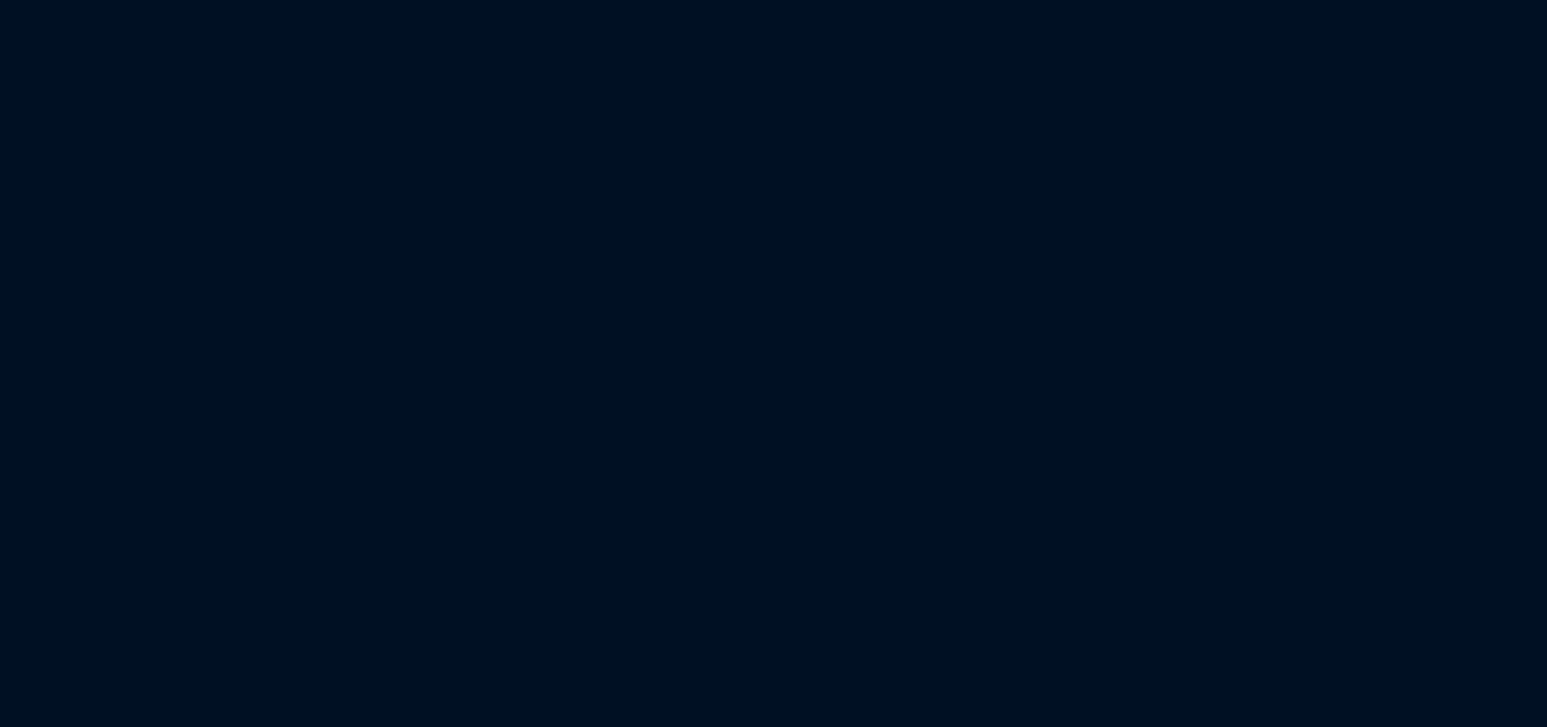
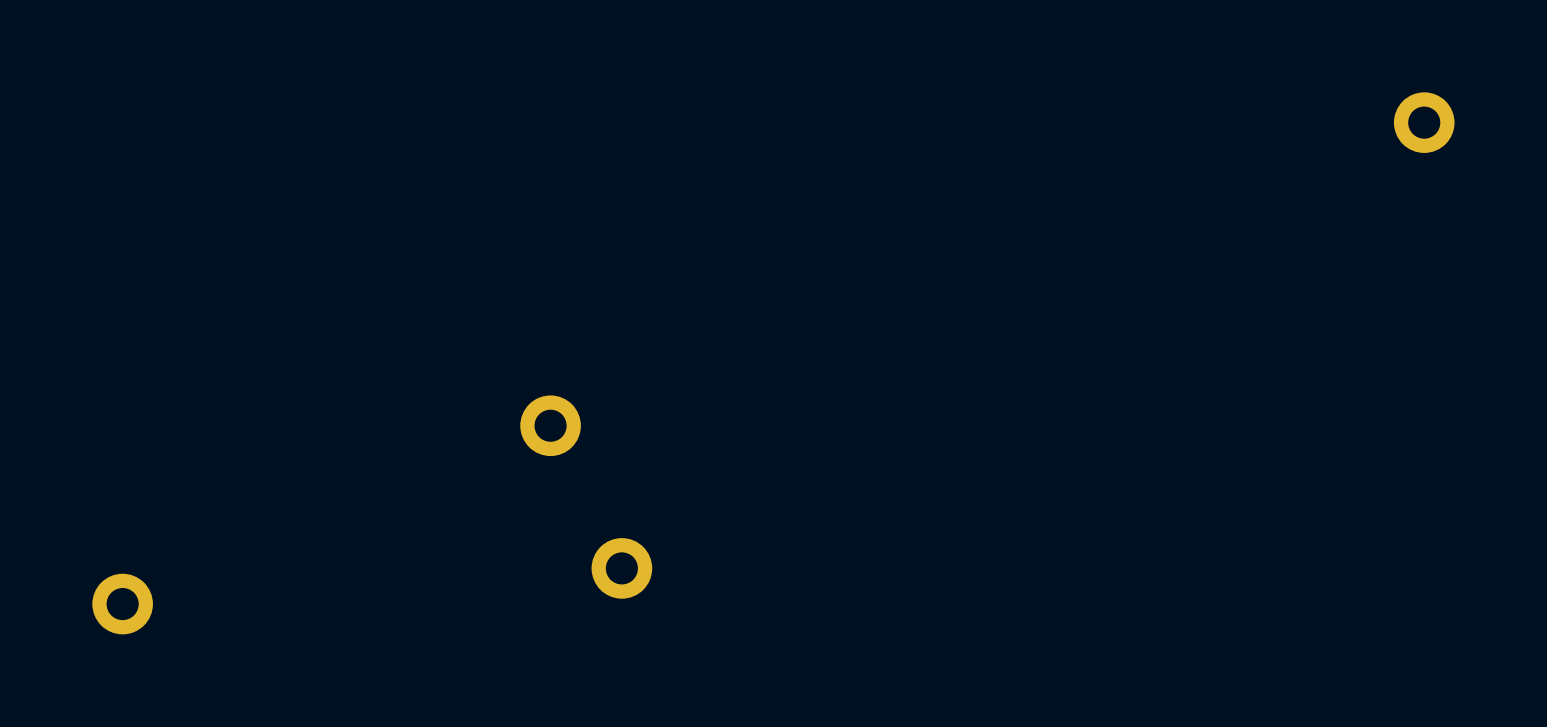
part: none -> (1424, 122)
part: none -> (550, 425)
part: none -> (621, 568)
part: none -> (122, 604)

